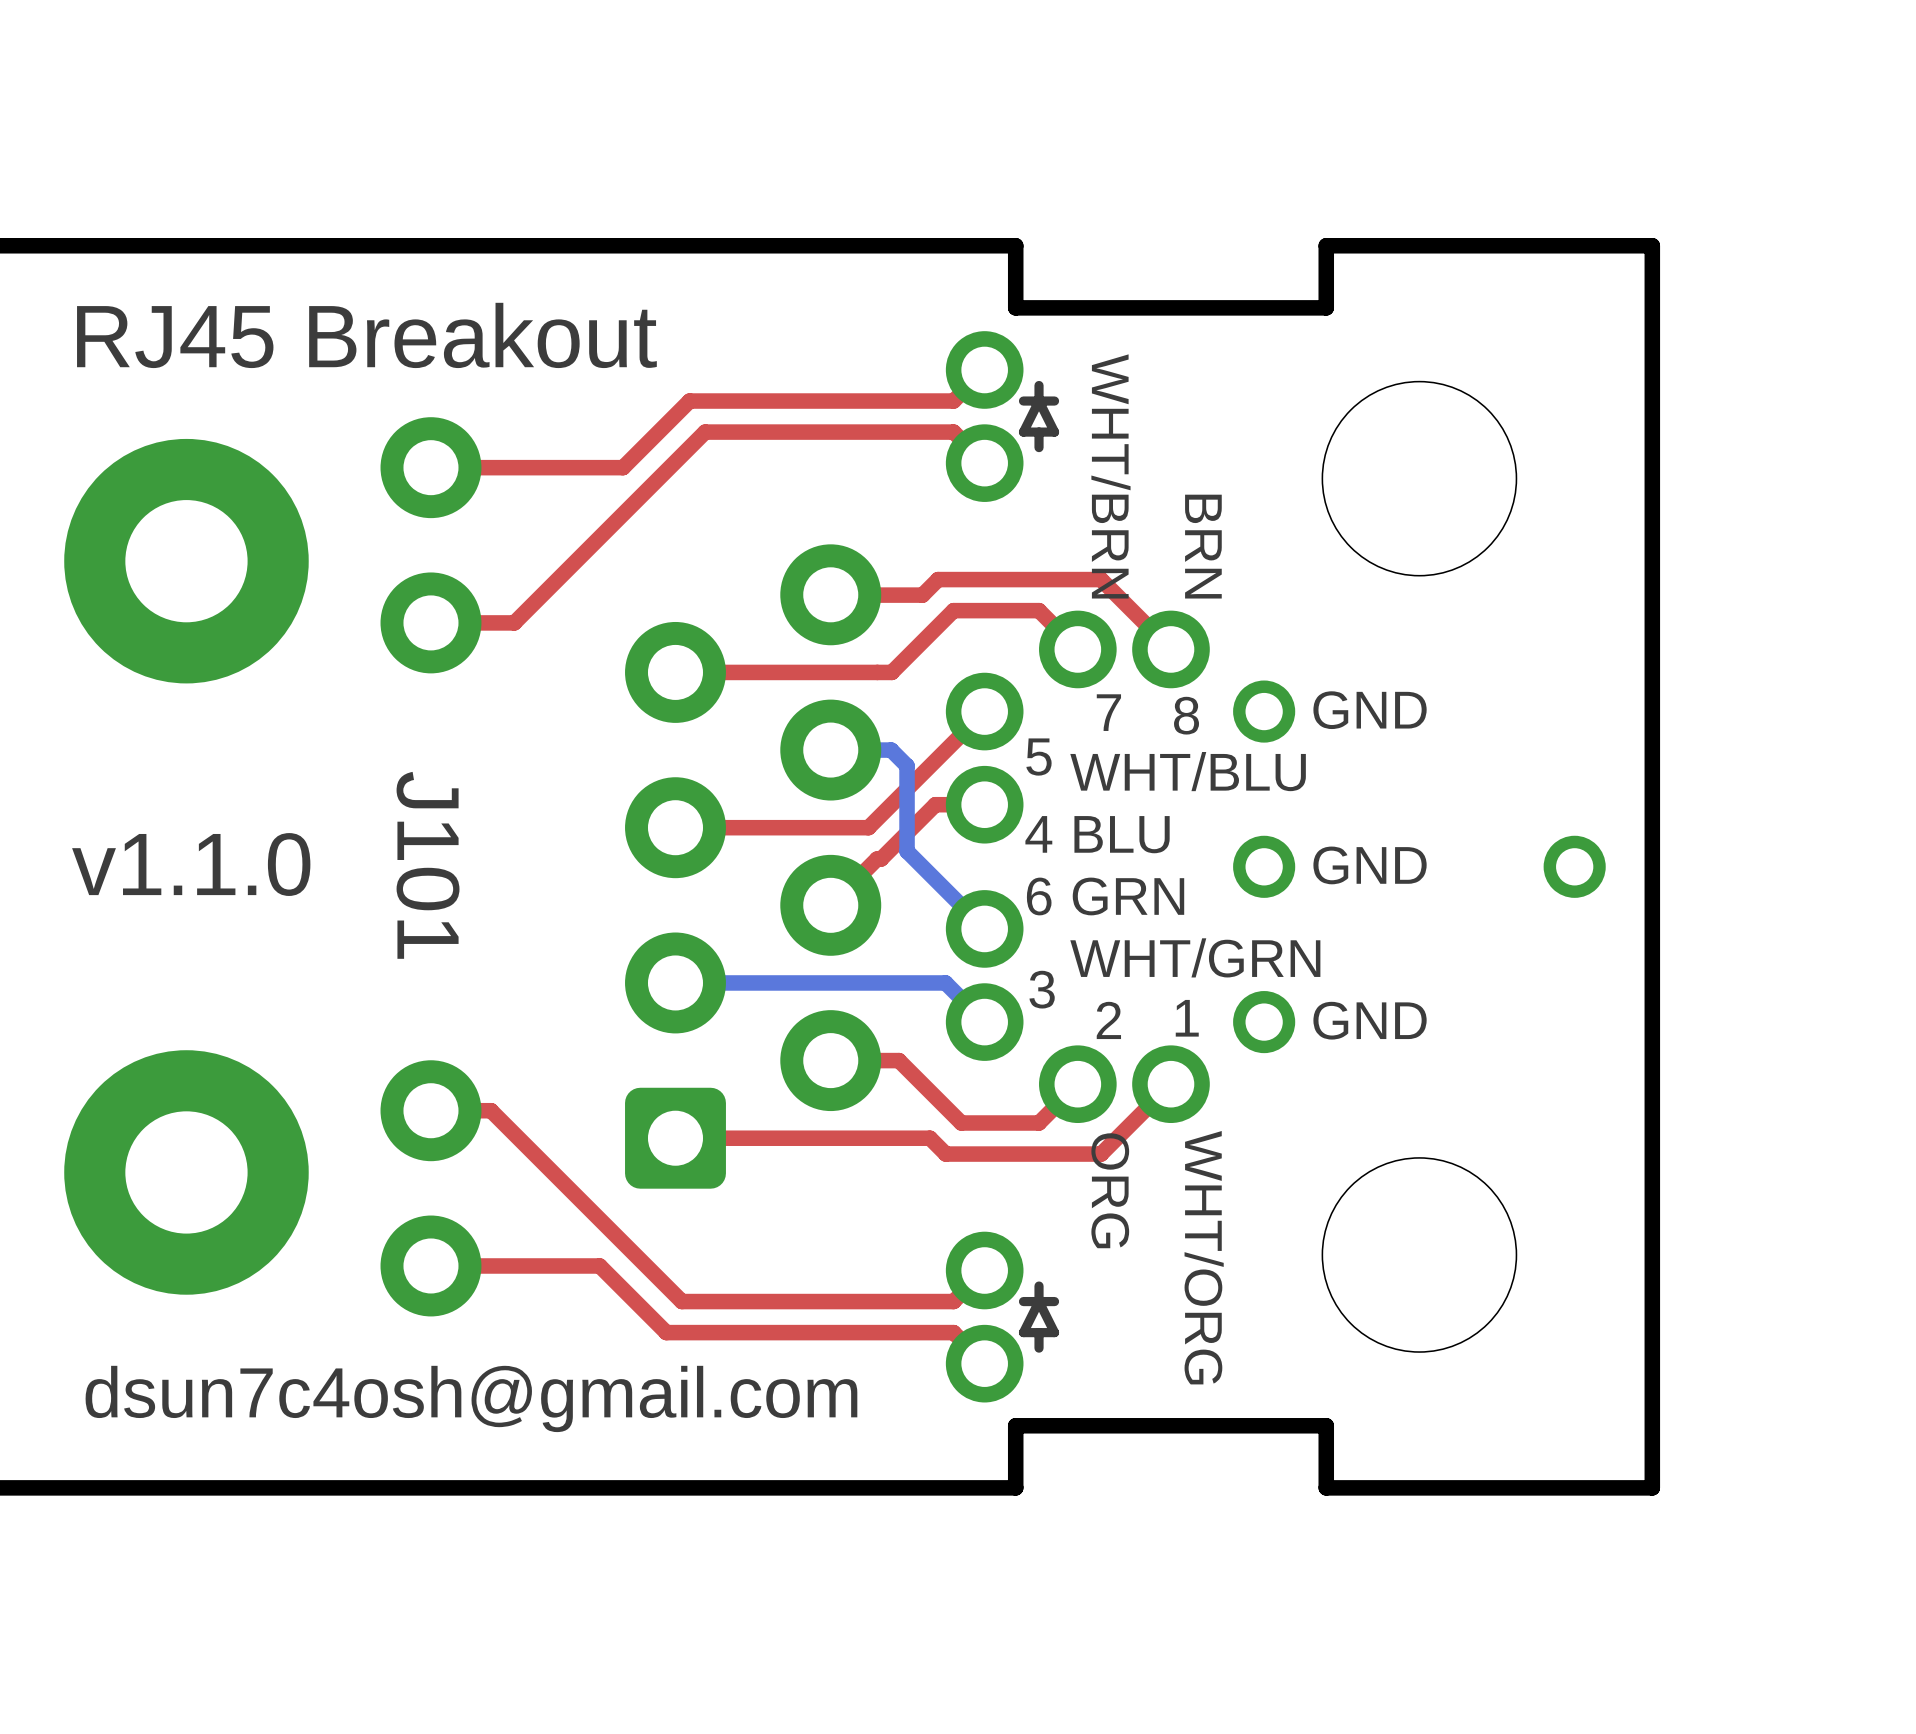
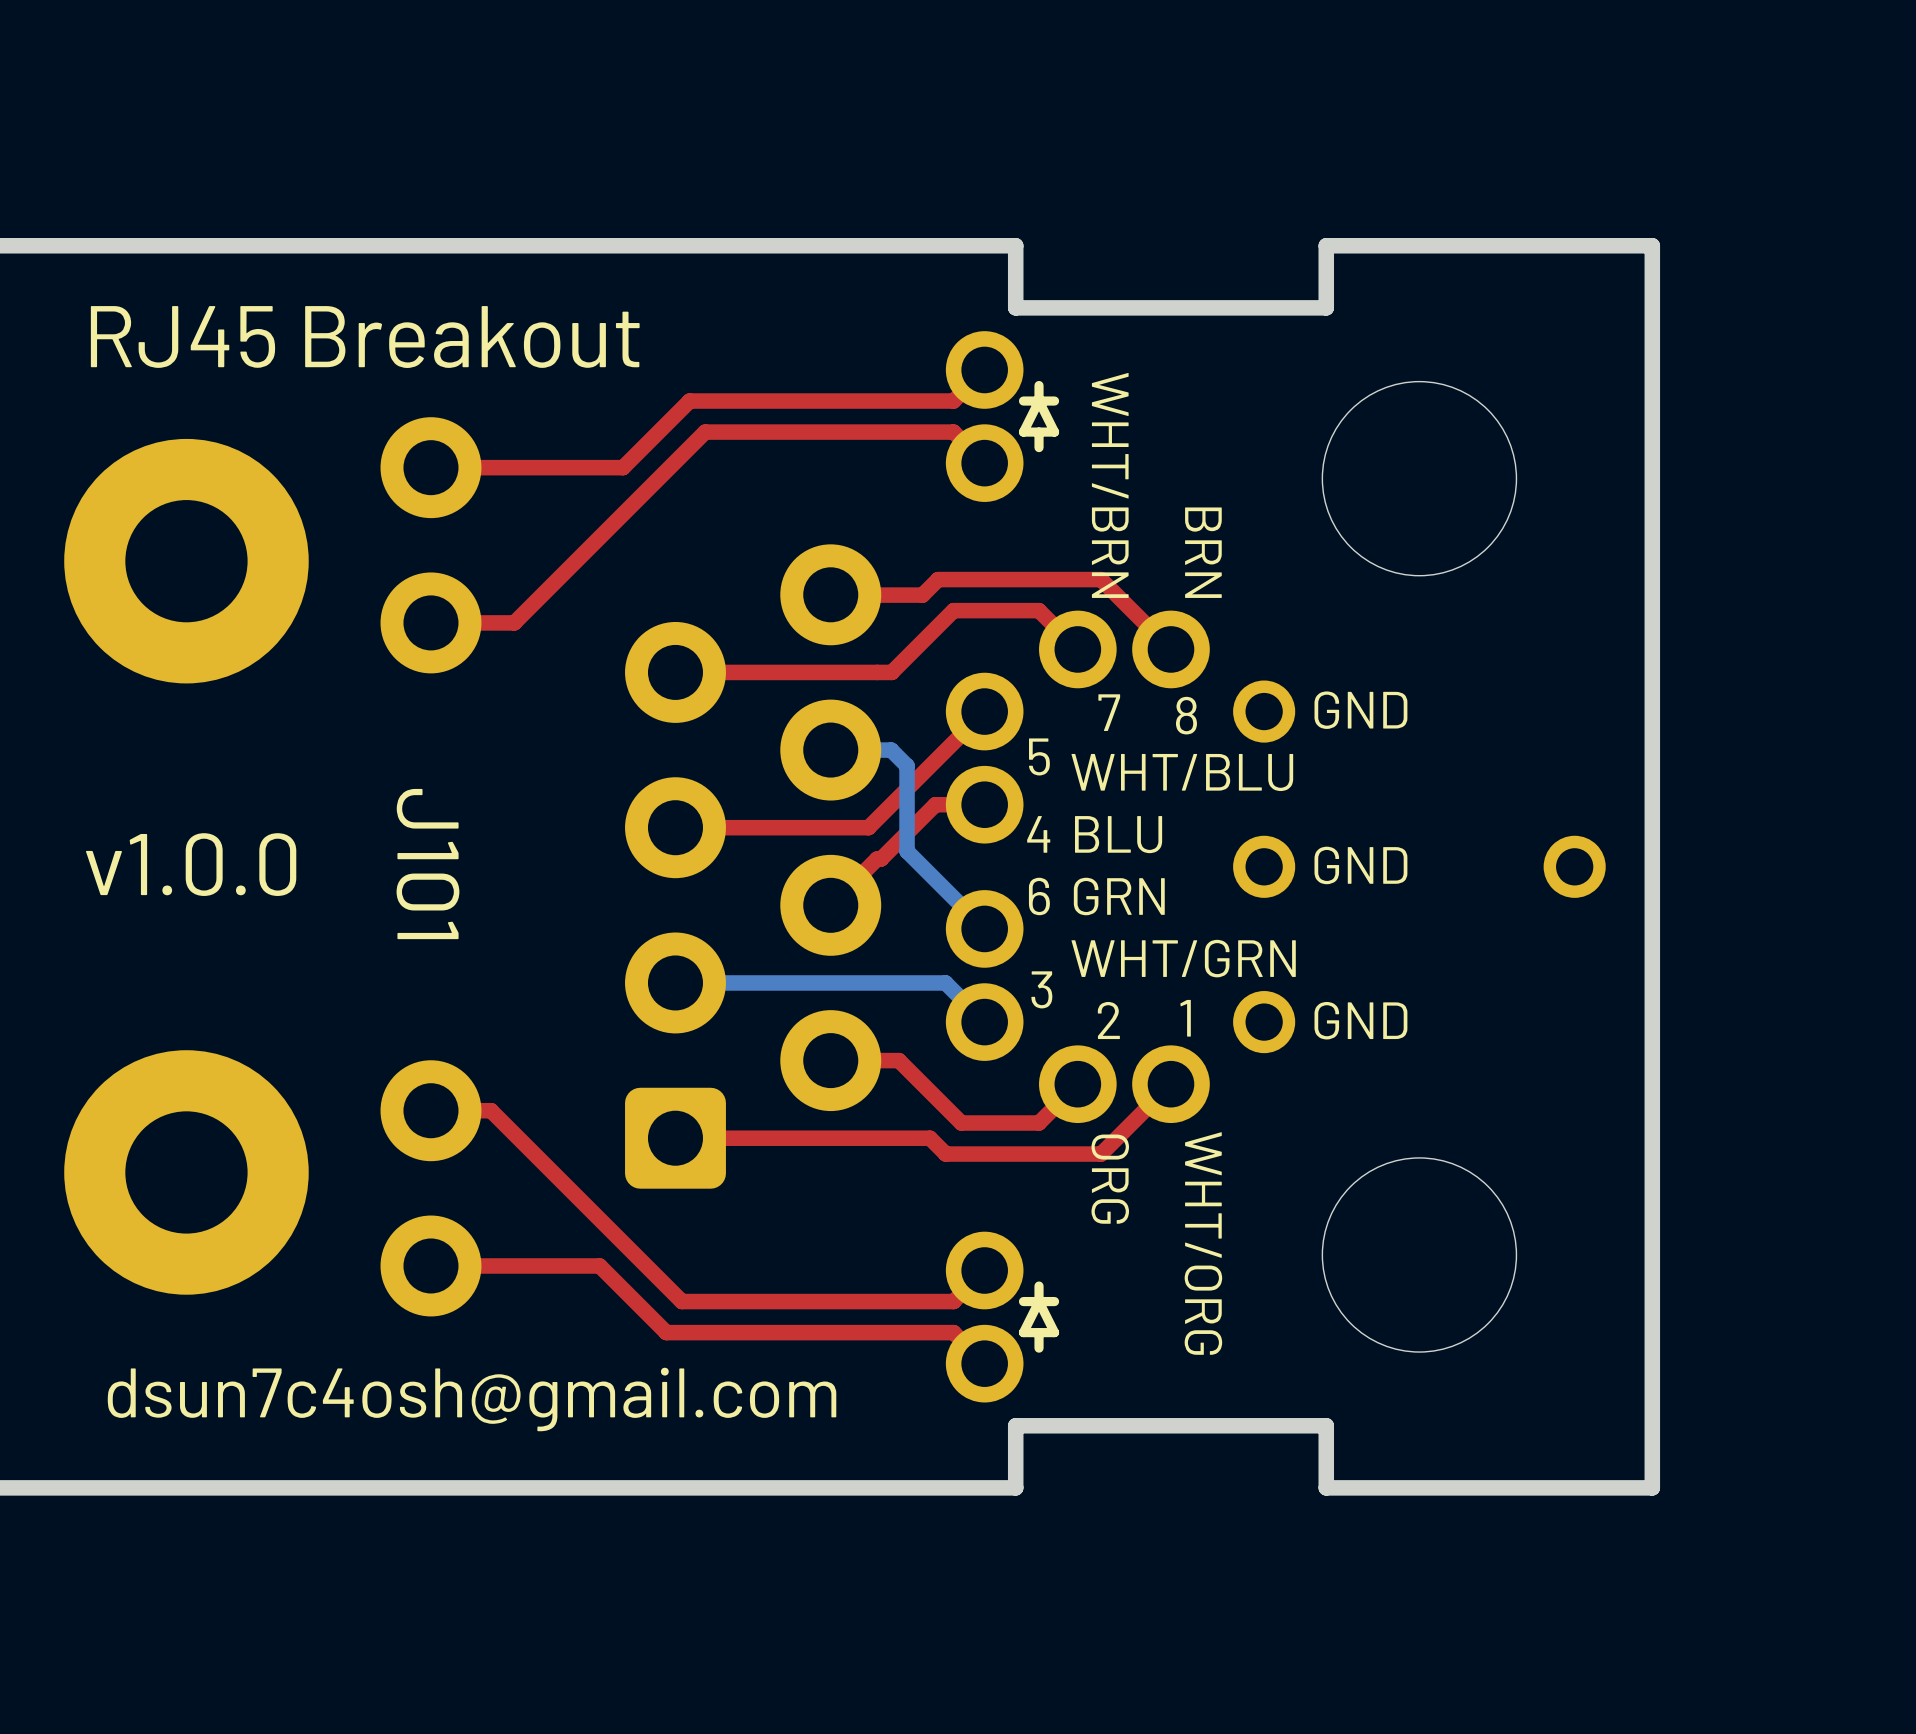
text: v1.1.0 (191, 864) -> v1.0.0 (191, 864)

